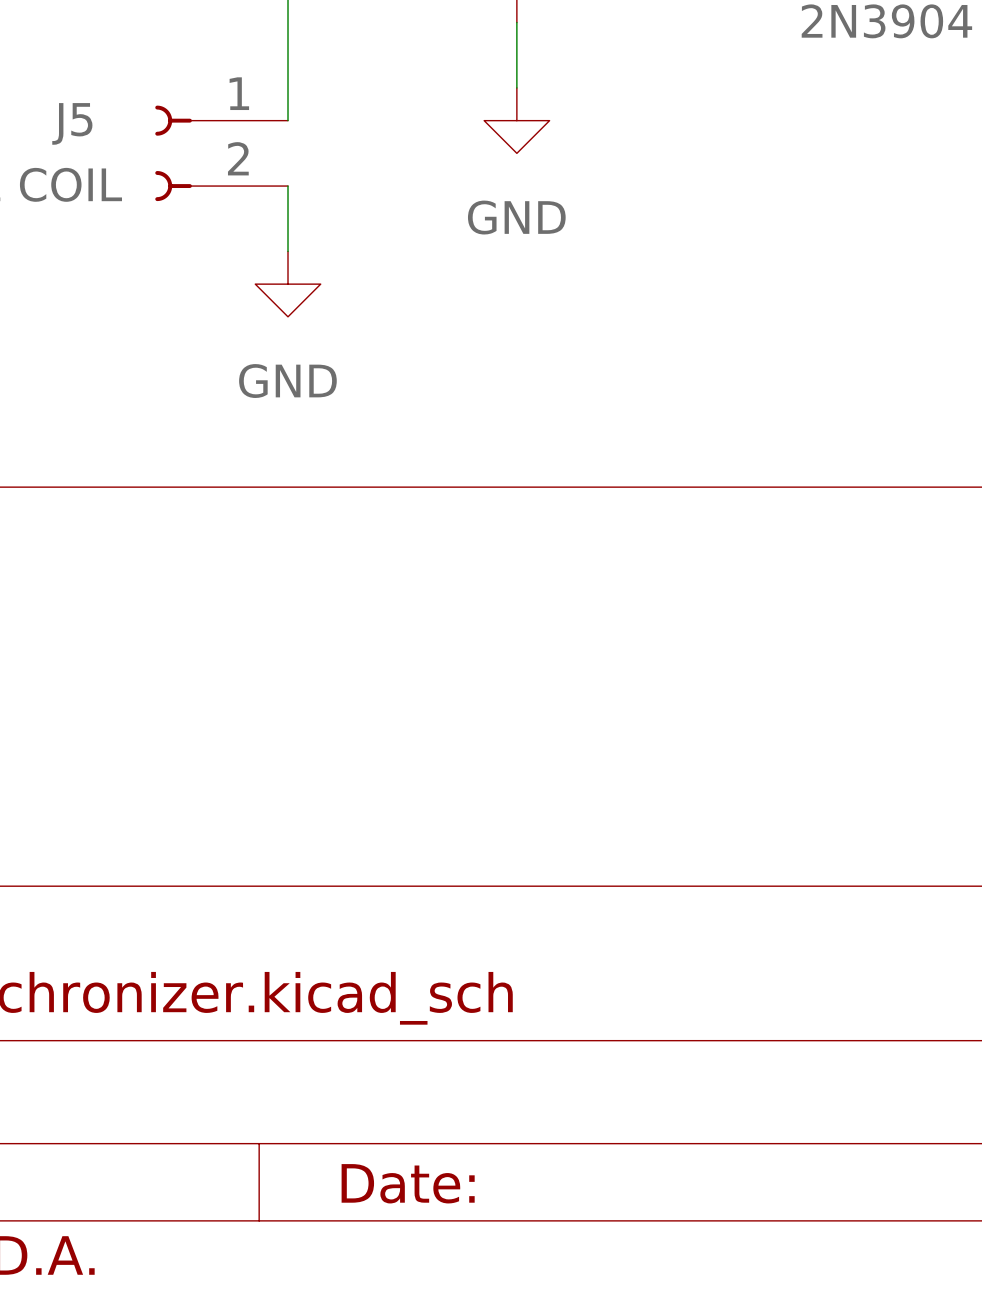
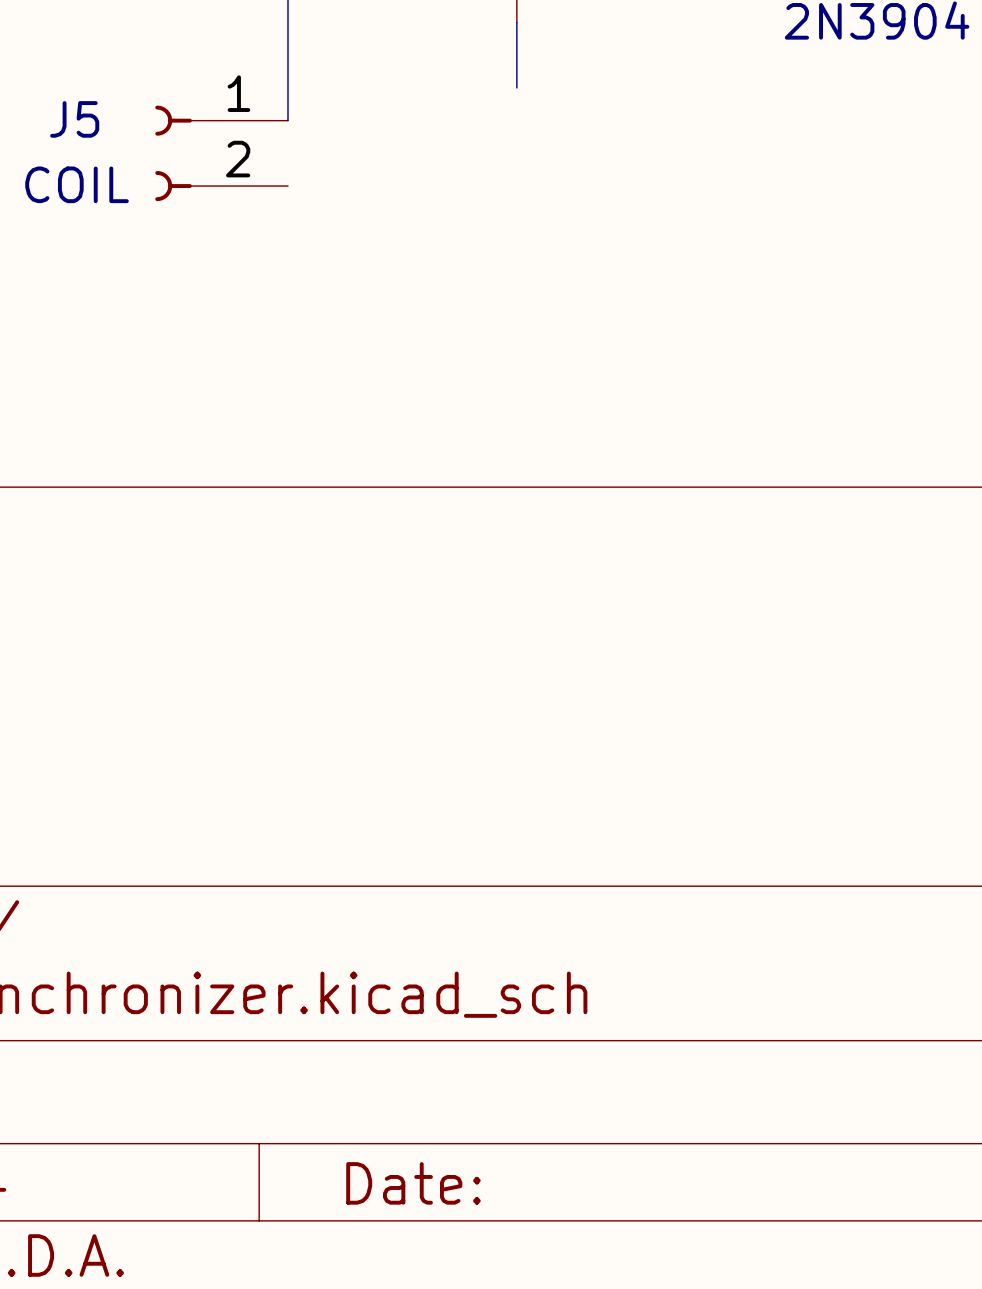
power symbol: GND (516, 120) -> none
wire: (288, 186) (288, 251) -> none
power symbol: GND (288, 284) -> none

